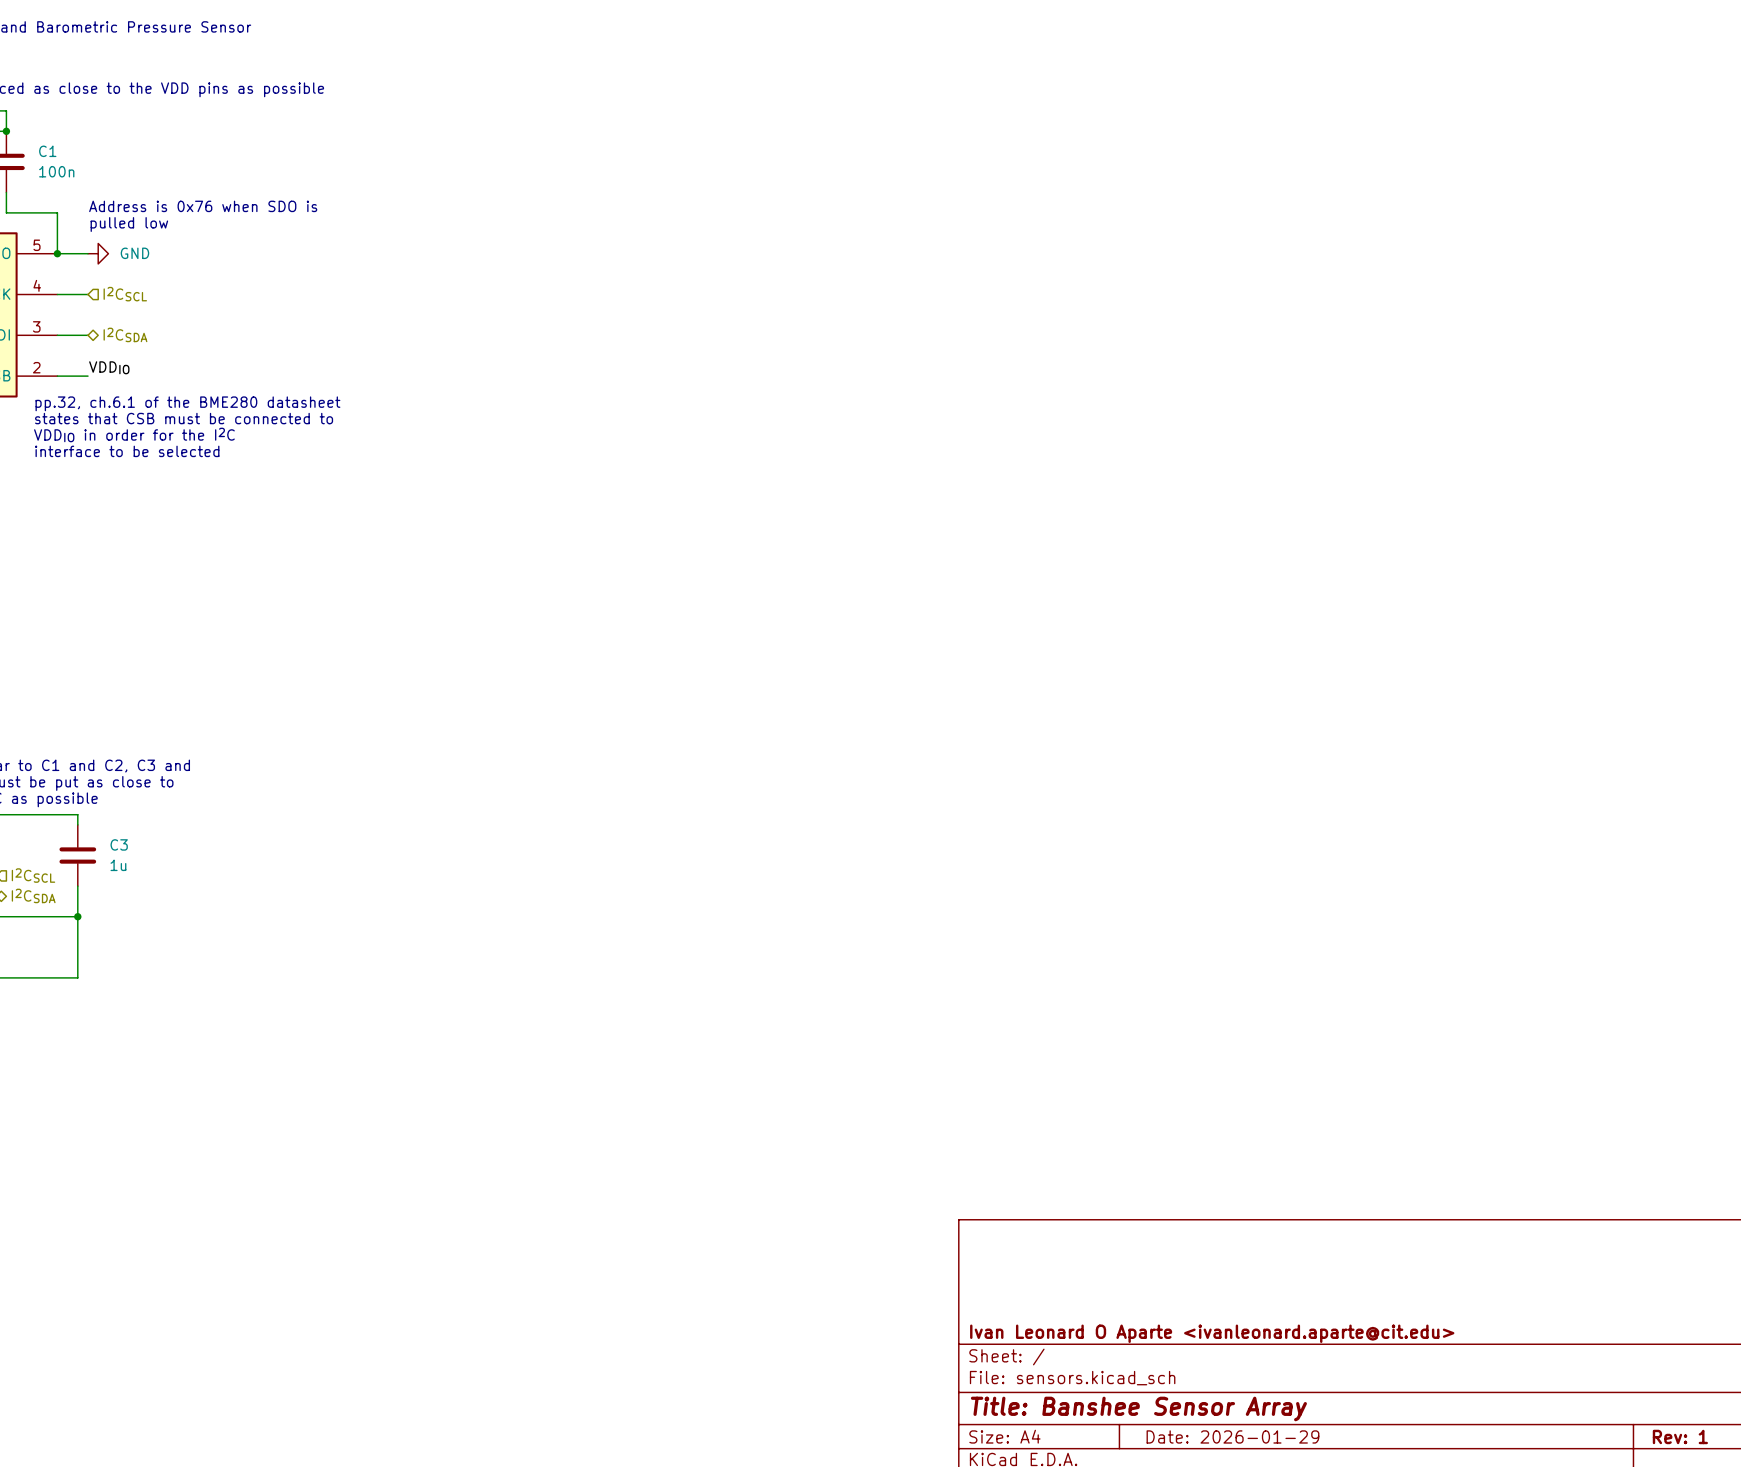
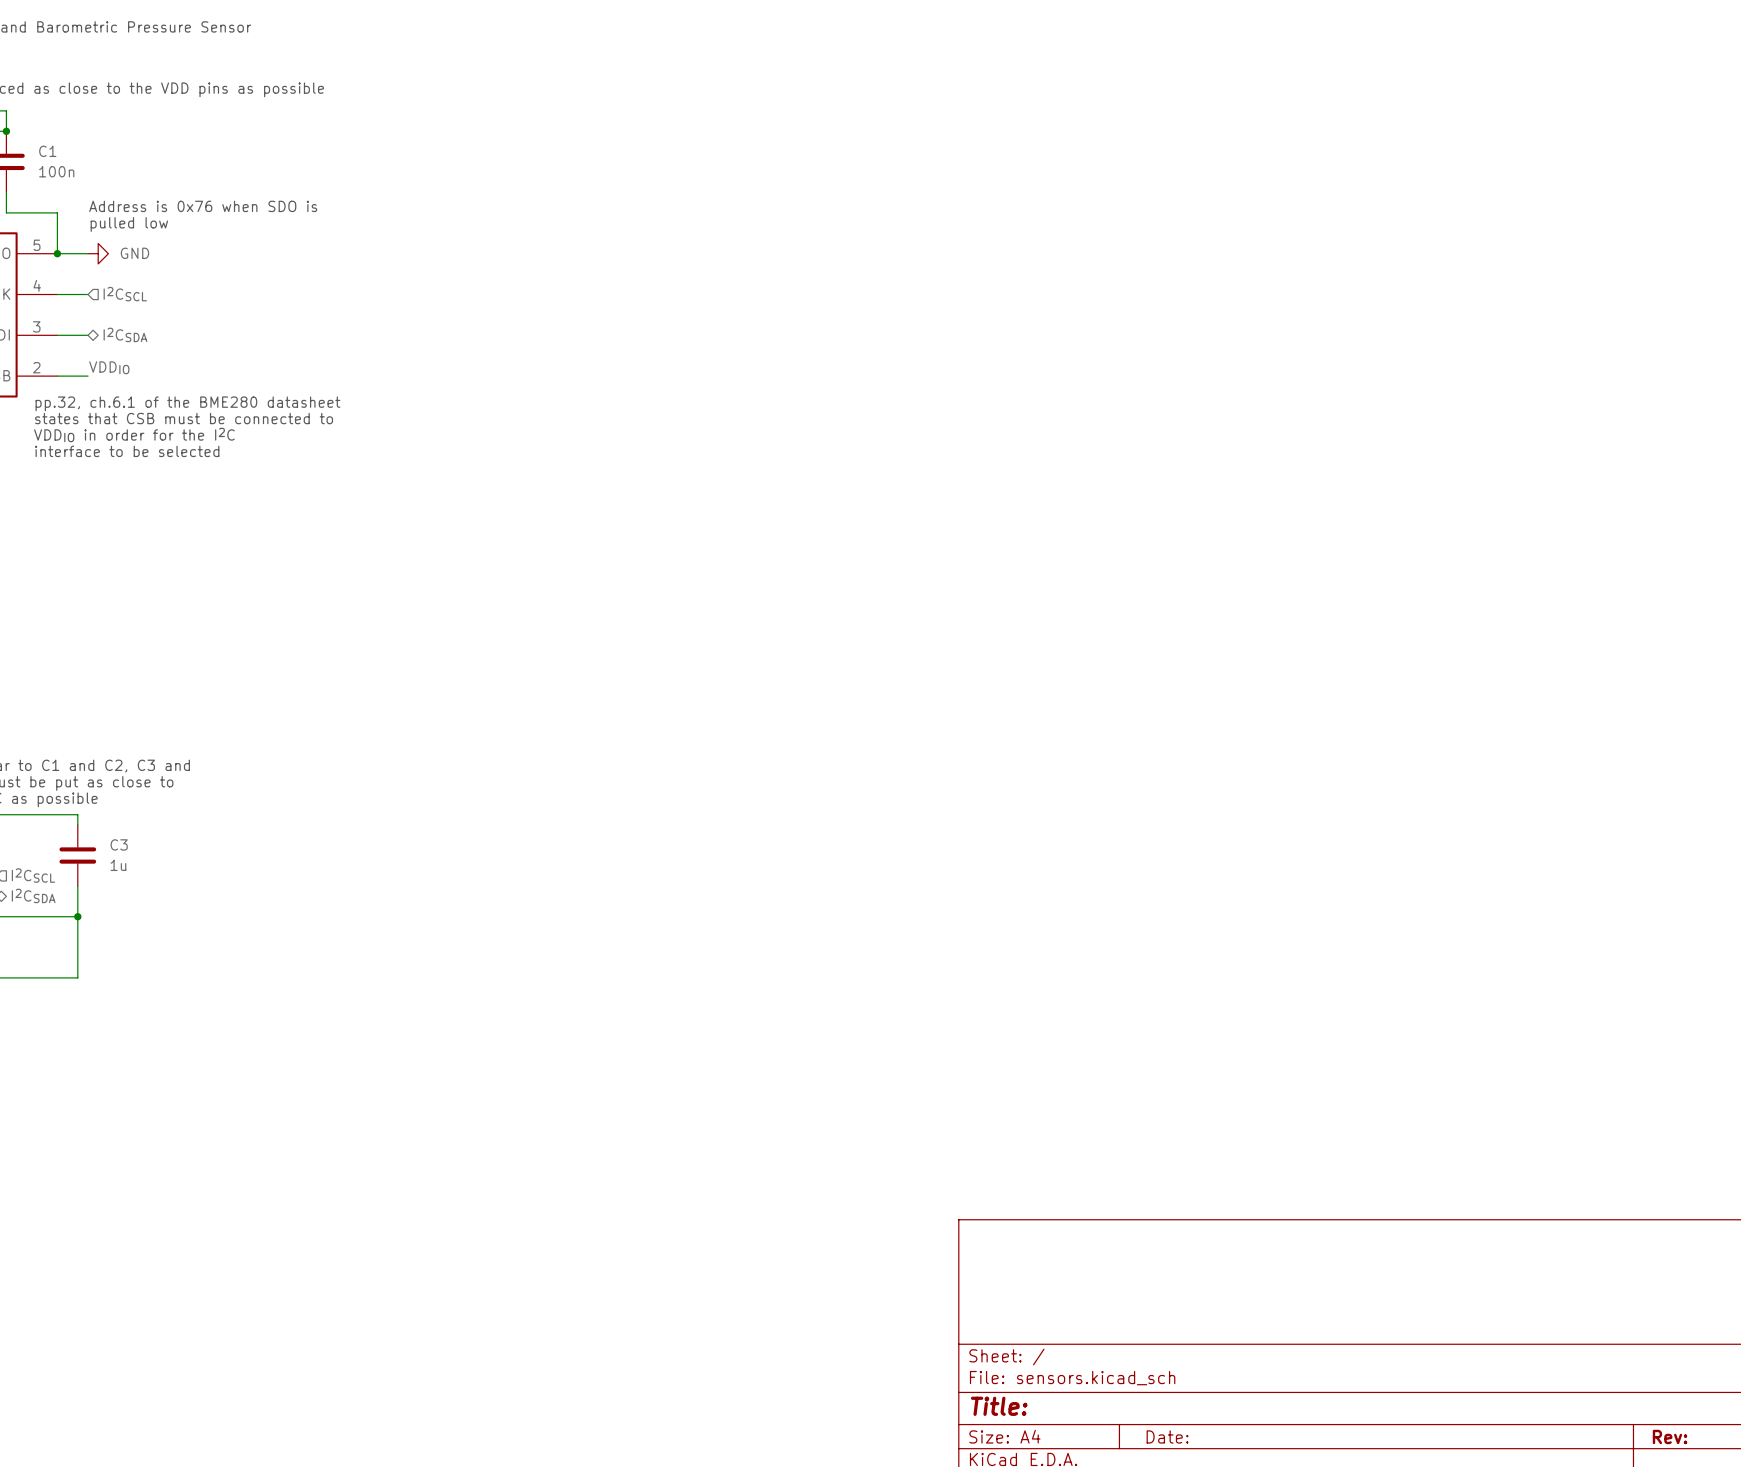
title block: Ivan Leonard O Aparte <ivanleonard.aparte@cit.edu> (1212, 1333) -> none
title block: Title: Banshee Sensor Array (1138, 1408) -> Title: (999, 1406)
title block: Date: 2026-01-29 (1232, 1436) -> Date: (1167, 1436)
title block: Rev: 1 (1680, 1436) -> Rev: (1670, 1436)

